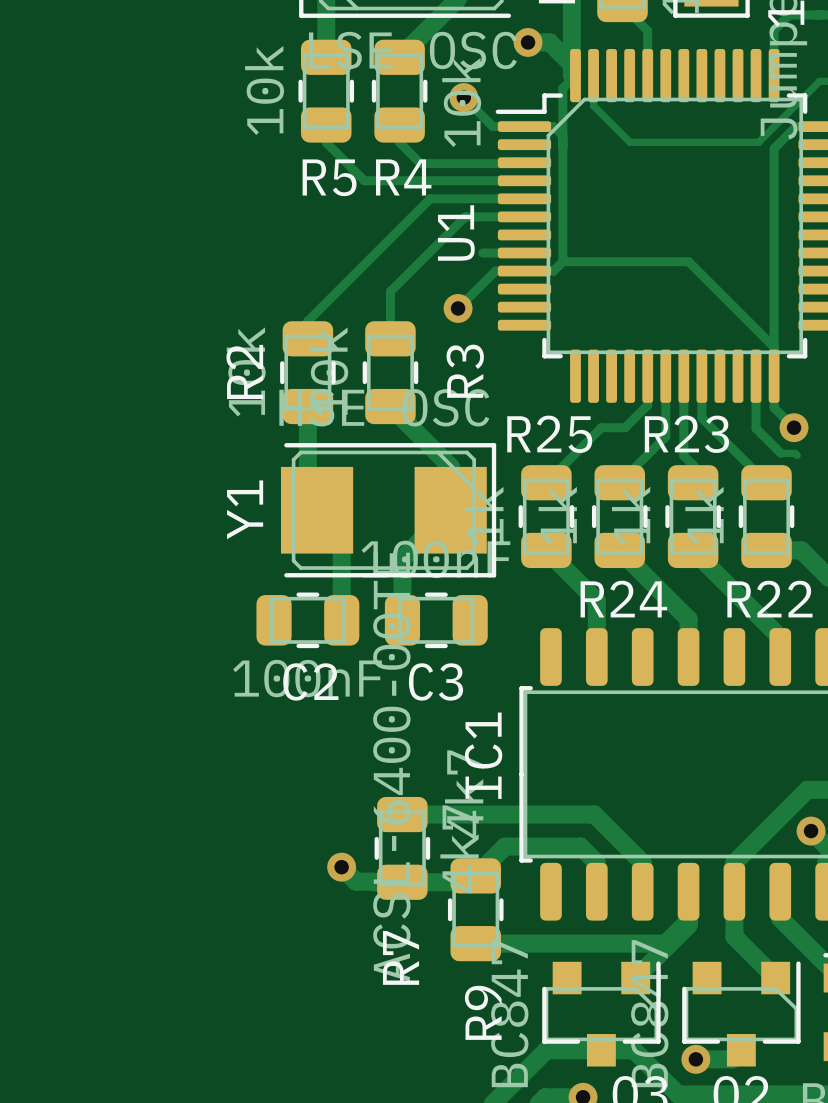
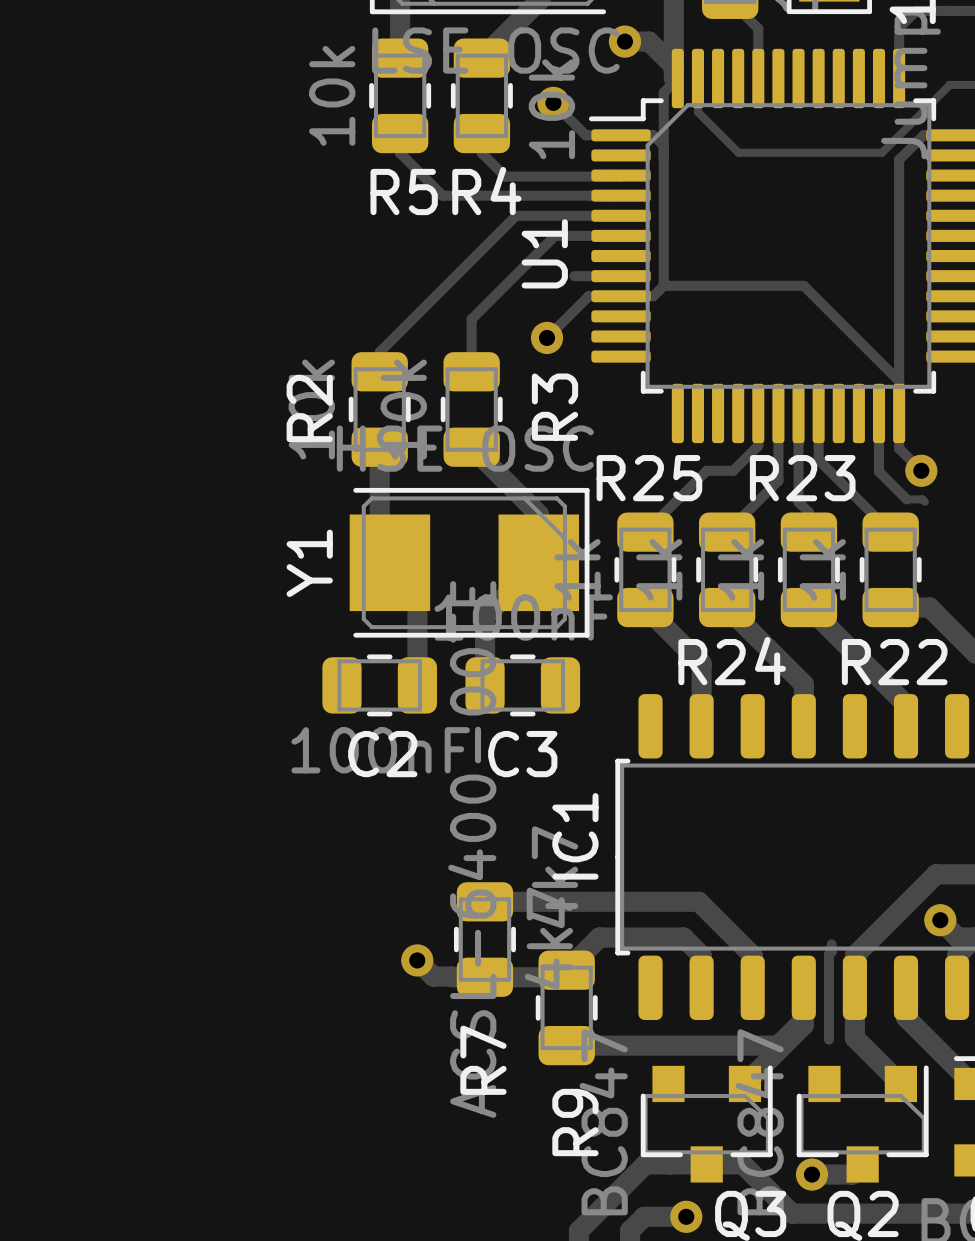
track: none -> (831, 944) (831, 951) (828, 954) (828, 1039)

